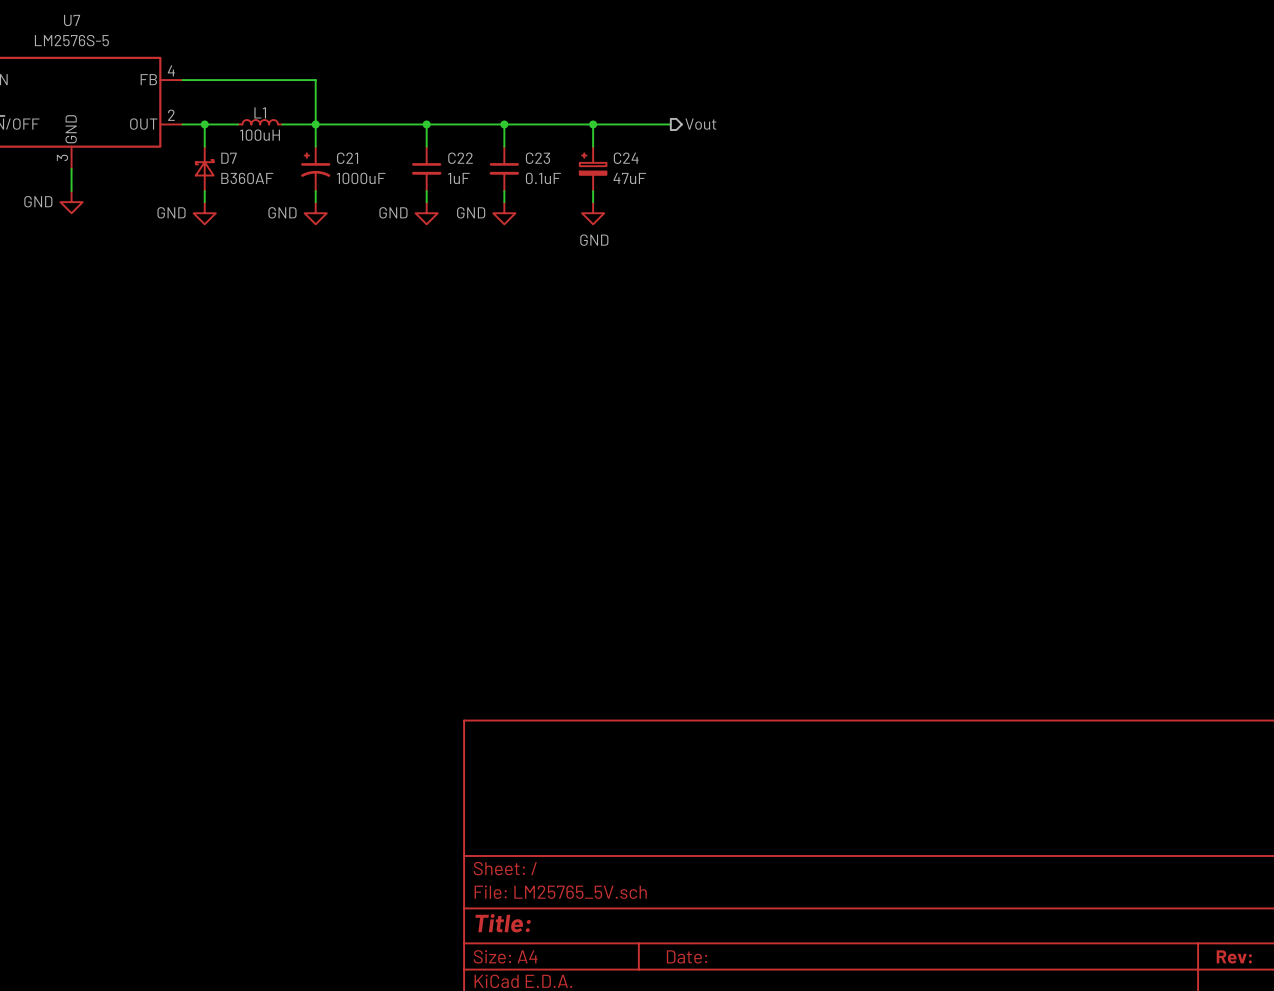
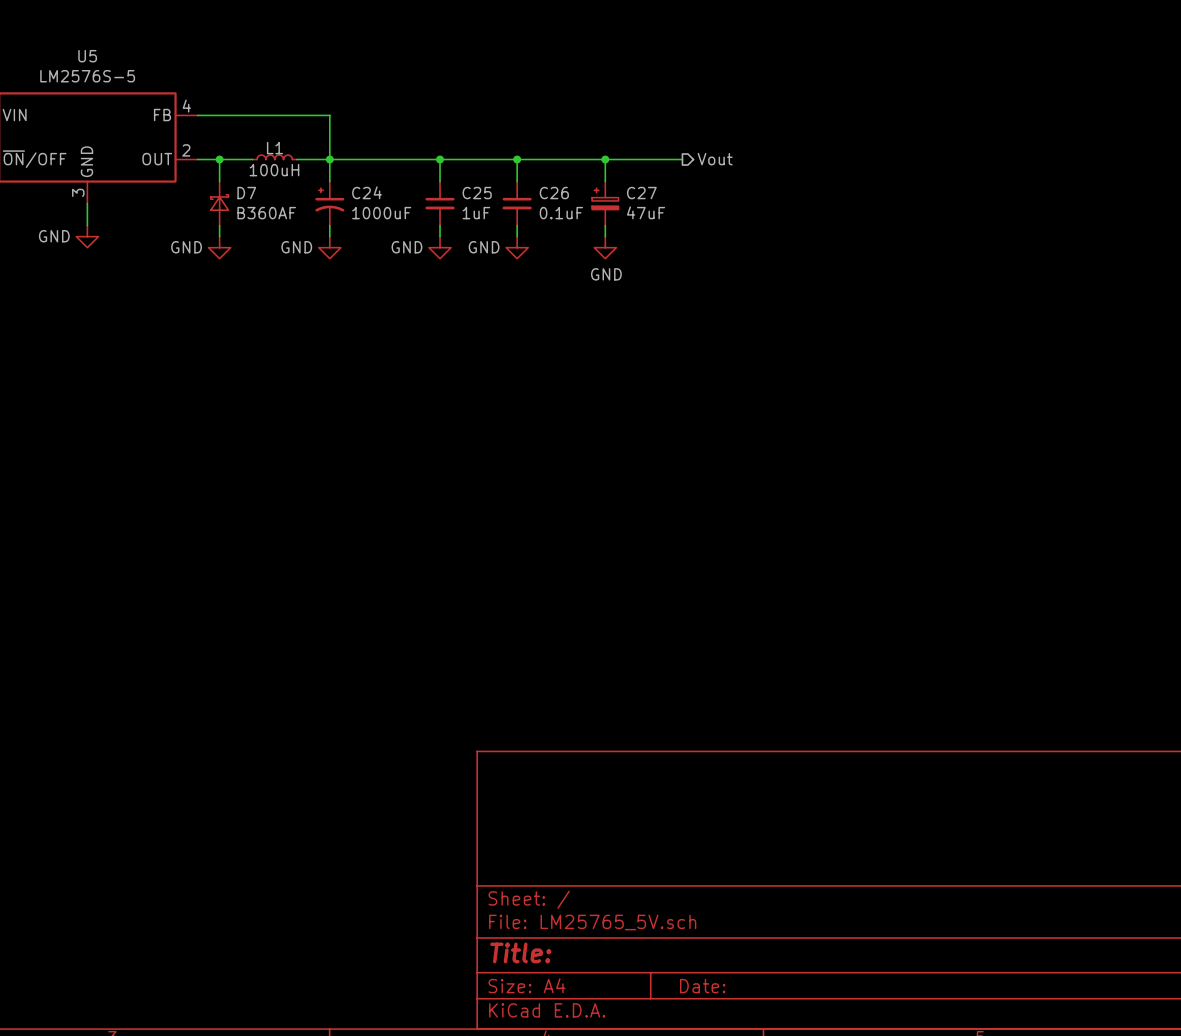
U7 name: U7 (72, 20) -> U5 (87, 56)
C21 name: C21 (347, 158) -> C24 (367, 192)
C22 name: C22 (460, 158) -> C25 (477, 193)
C23 name: C23 (537, 158) -> C26 (554, 193)
C24 name: C24 (626, 158) -> C27 (641, 193)

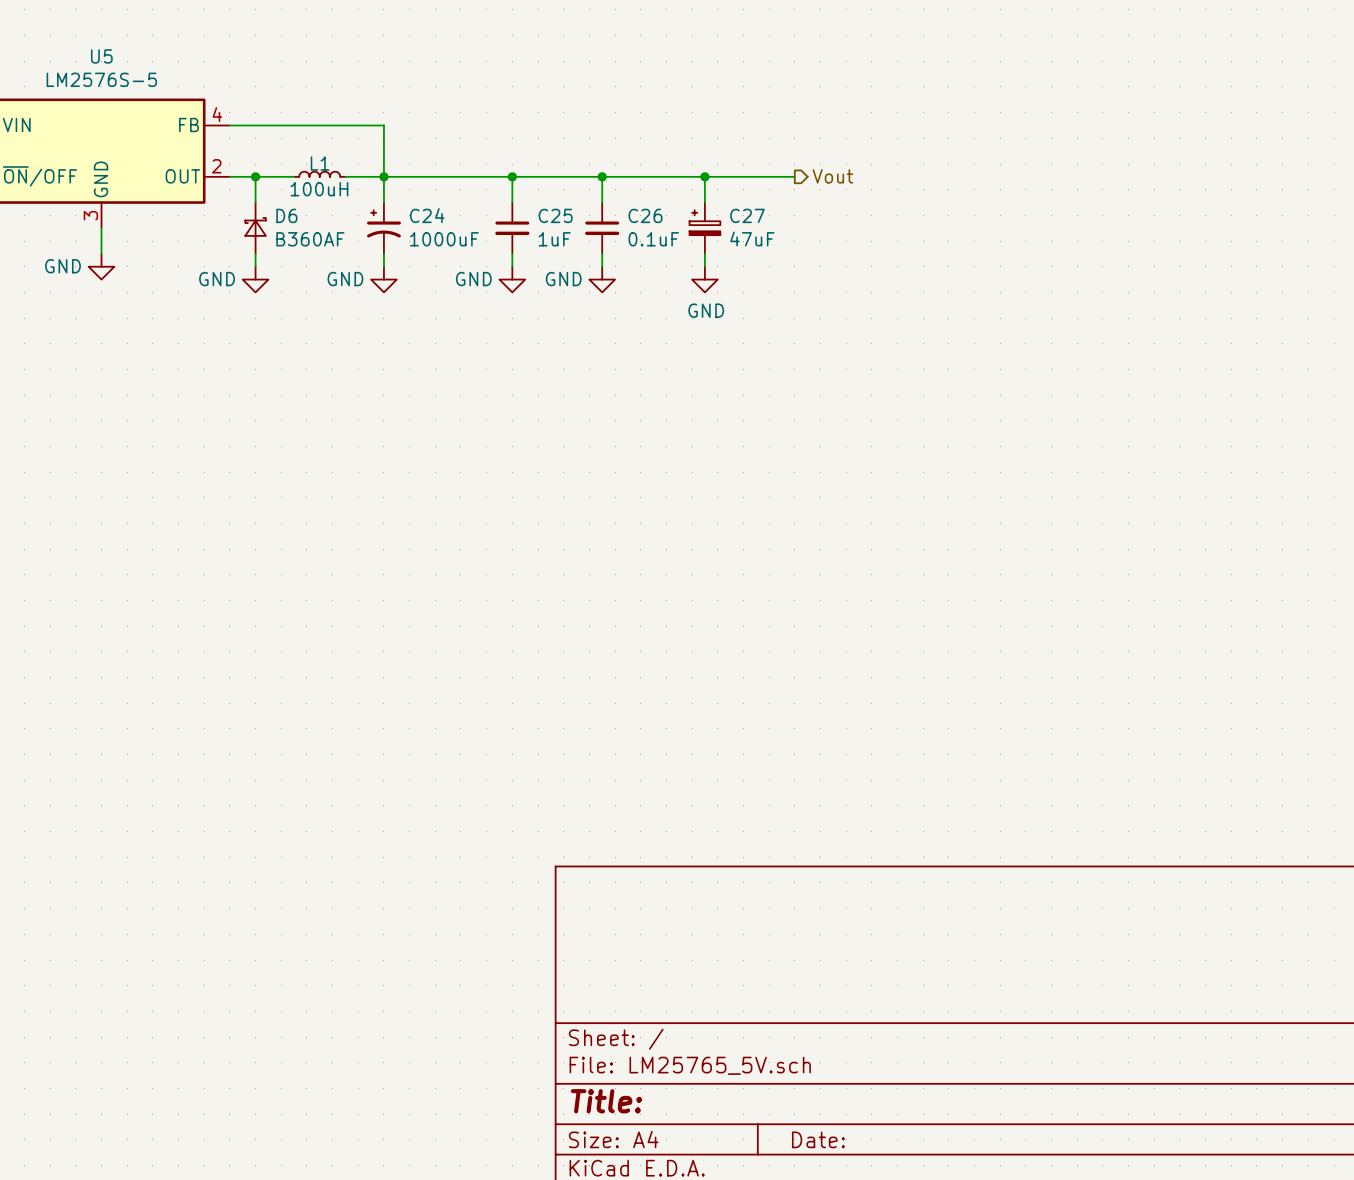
D7 name: D7 (246, 193) -> D6 (286, 215)

